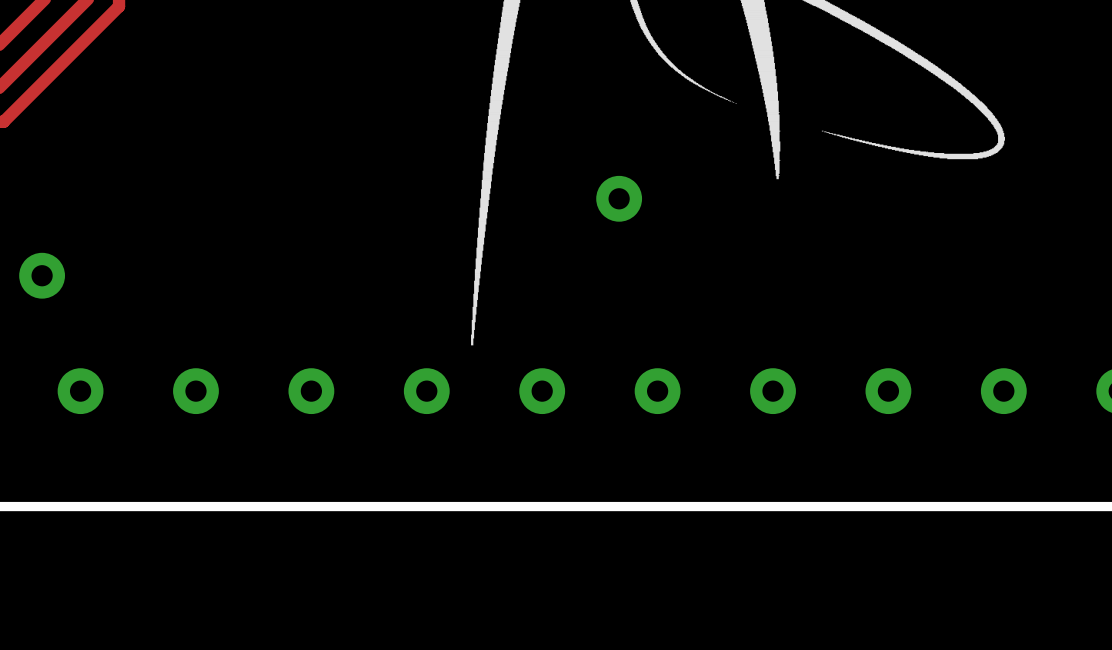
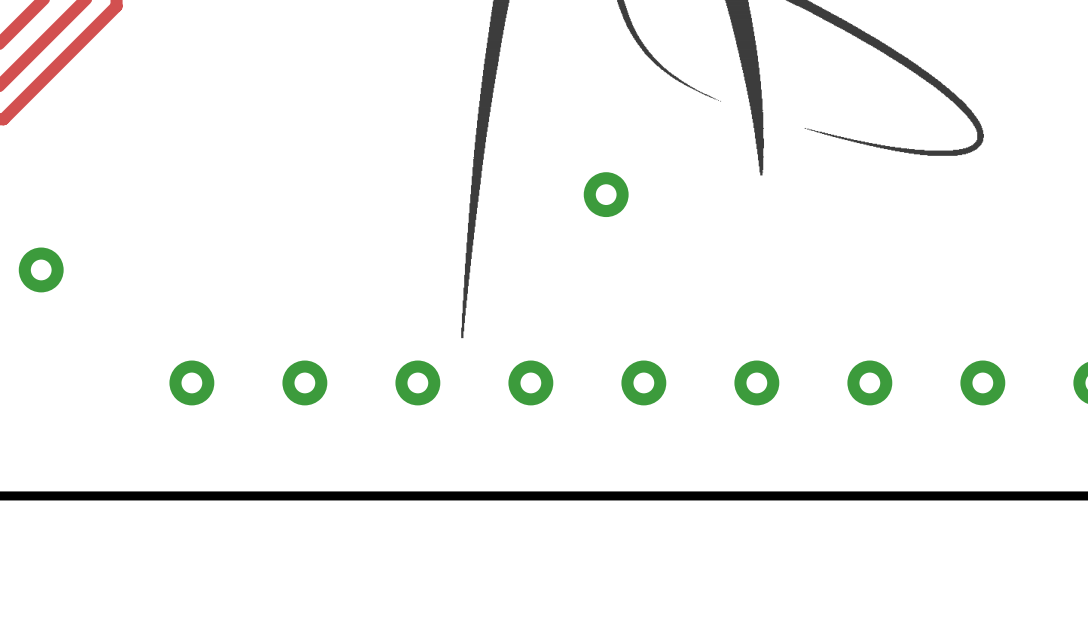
via: (80, 391) -> none

